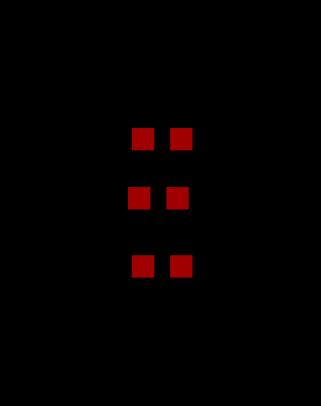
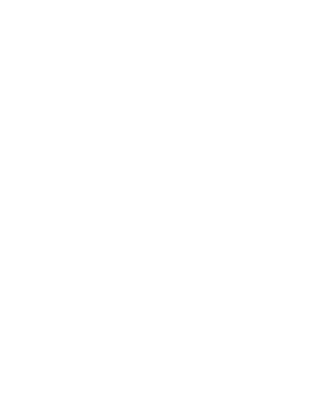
part: (162, 139) -> none
part: (158, 198) -> none
part: (162, 266) -> none

